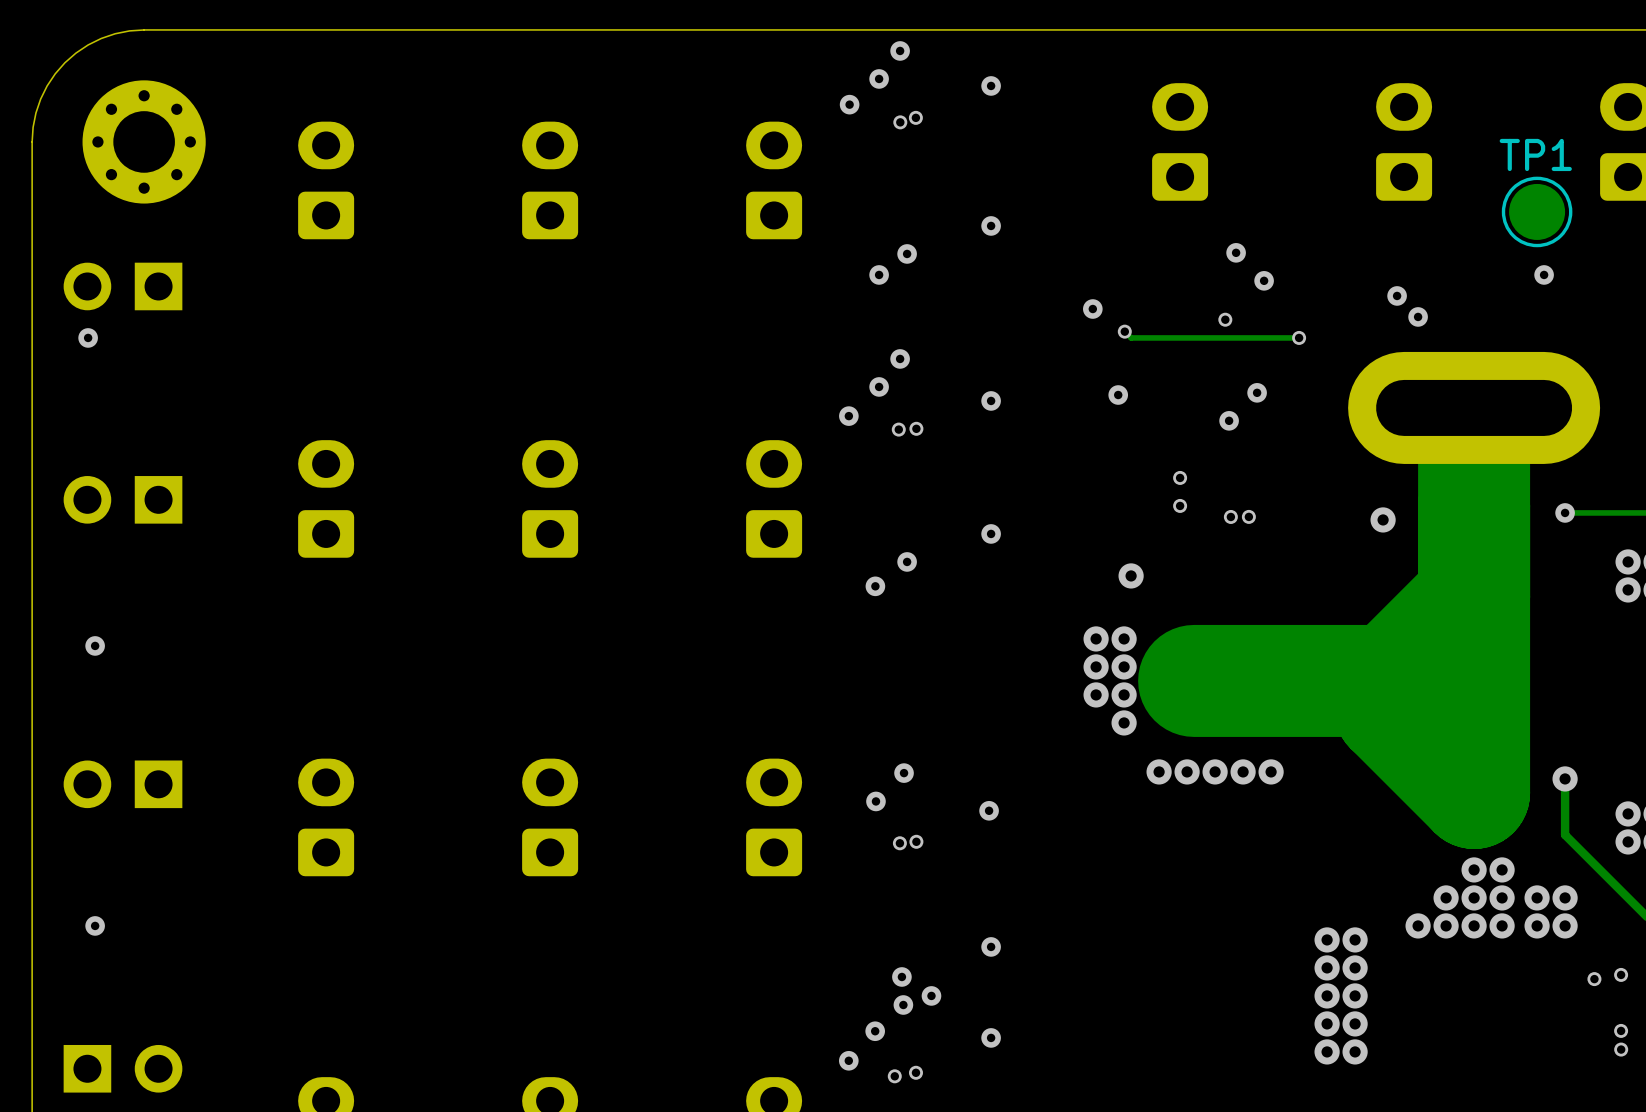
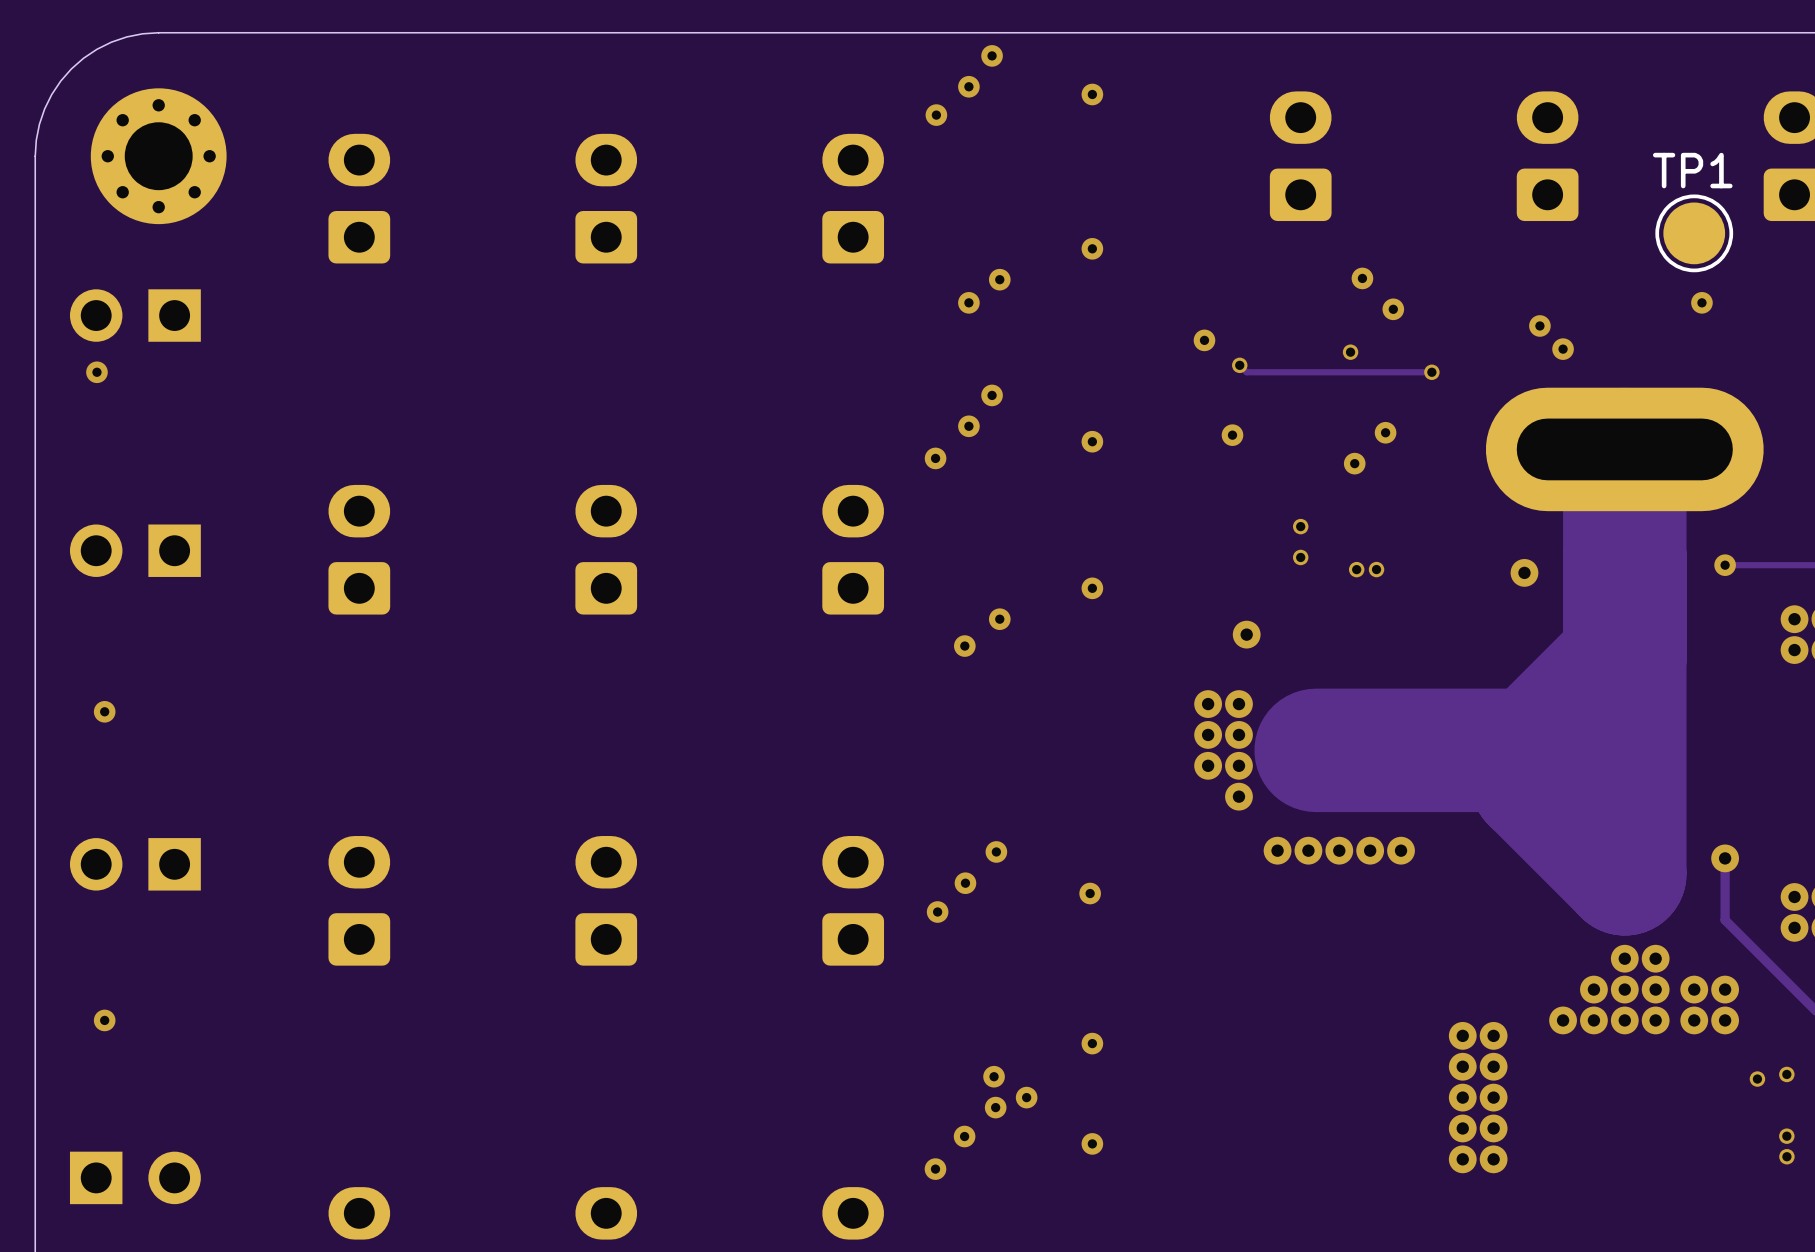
via: (915, 117) -> none
via: (900, 122) -> none
via: (916, 428) -> none
via: (898, 429) -> none
via: none -> (937, 912)
via: (916, 841) -> none
via: (899, 843) -> none
via: (915, 1072) -> none
via: (894, 1076) -> none

